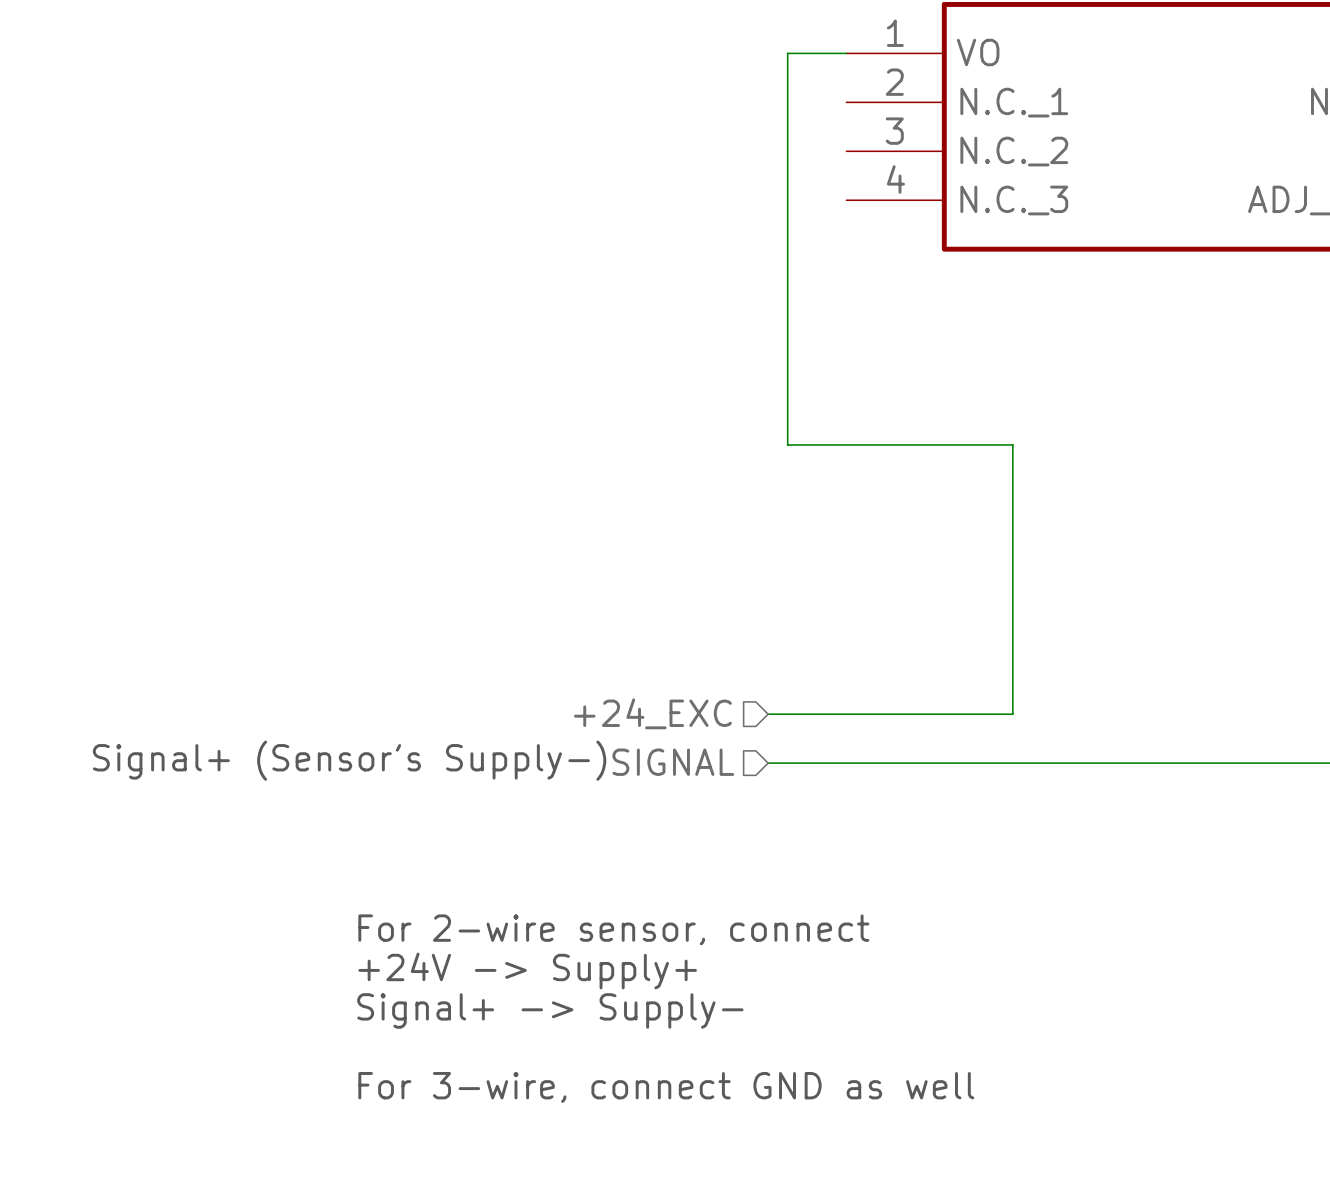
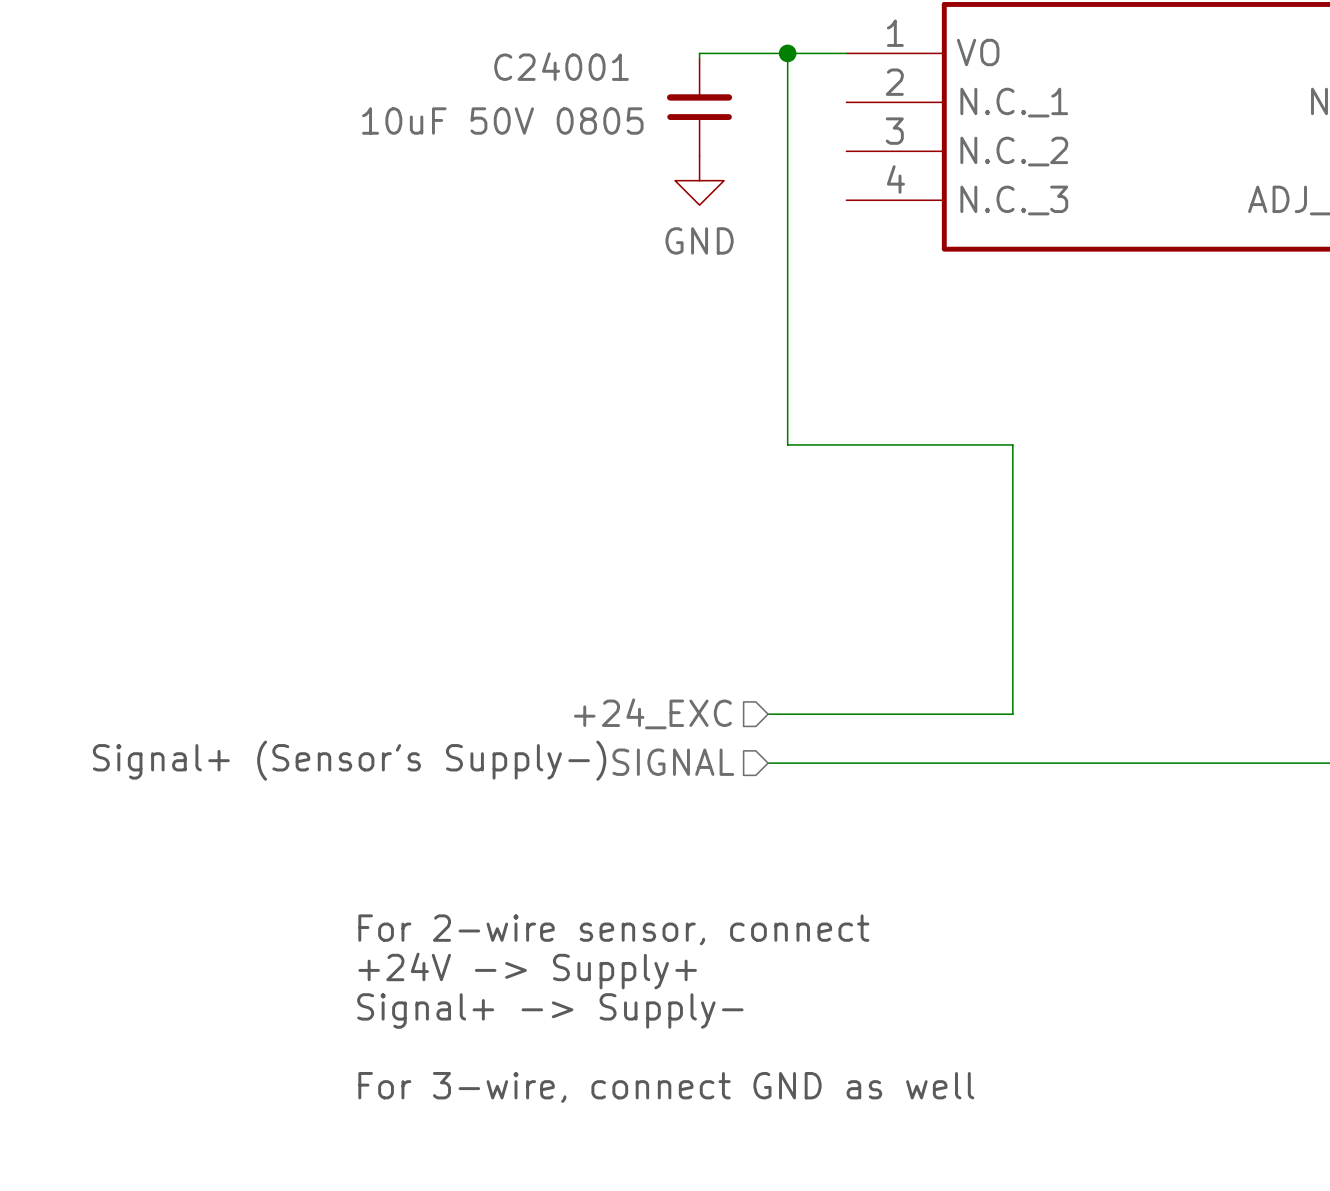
wire: none -> (787, 53) (699, 53) (699, 58)
junction: none -> (787, 53)
C24001: none -> 10uF 50V 0805 (699, 107)
power symbol: none -> GND (699, 180)

